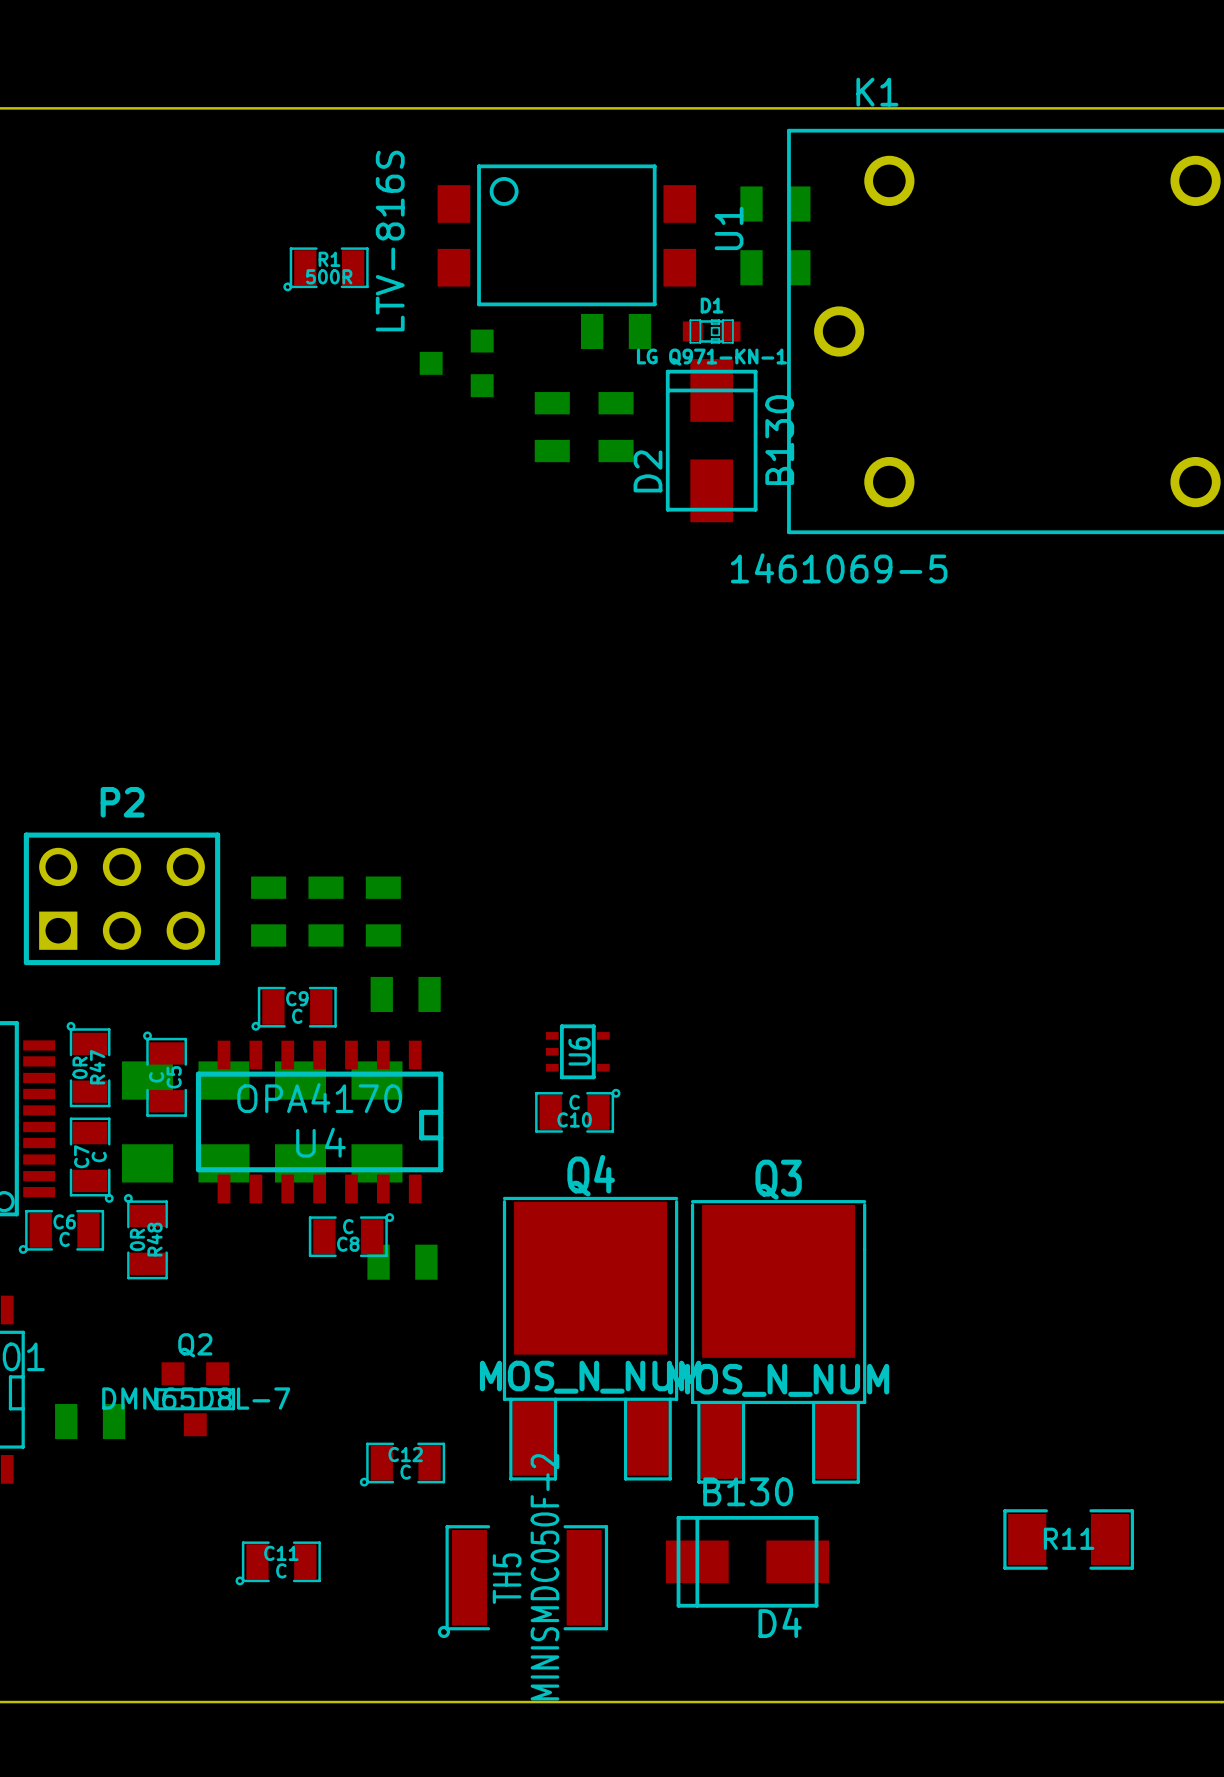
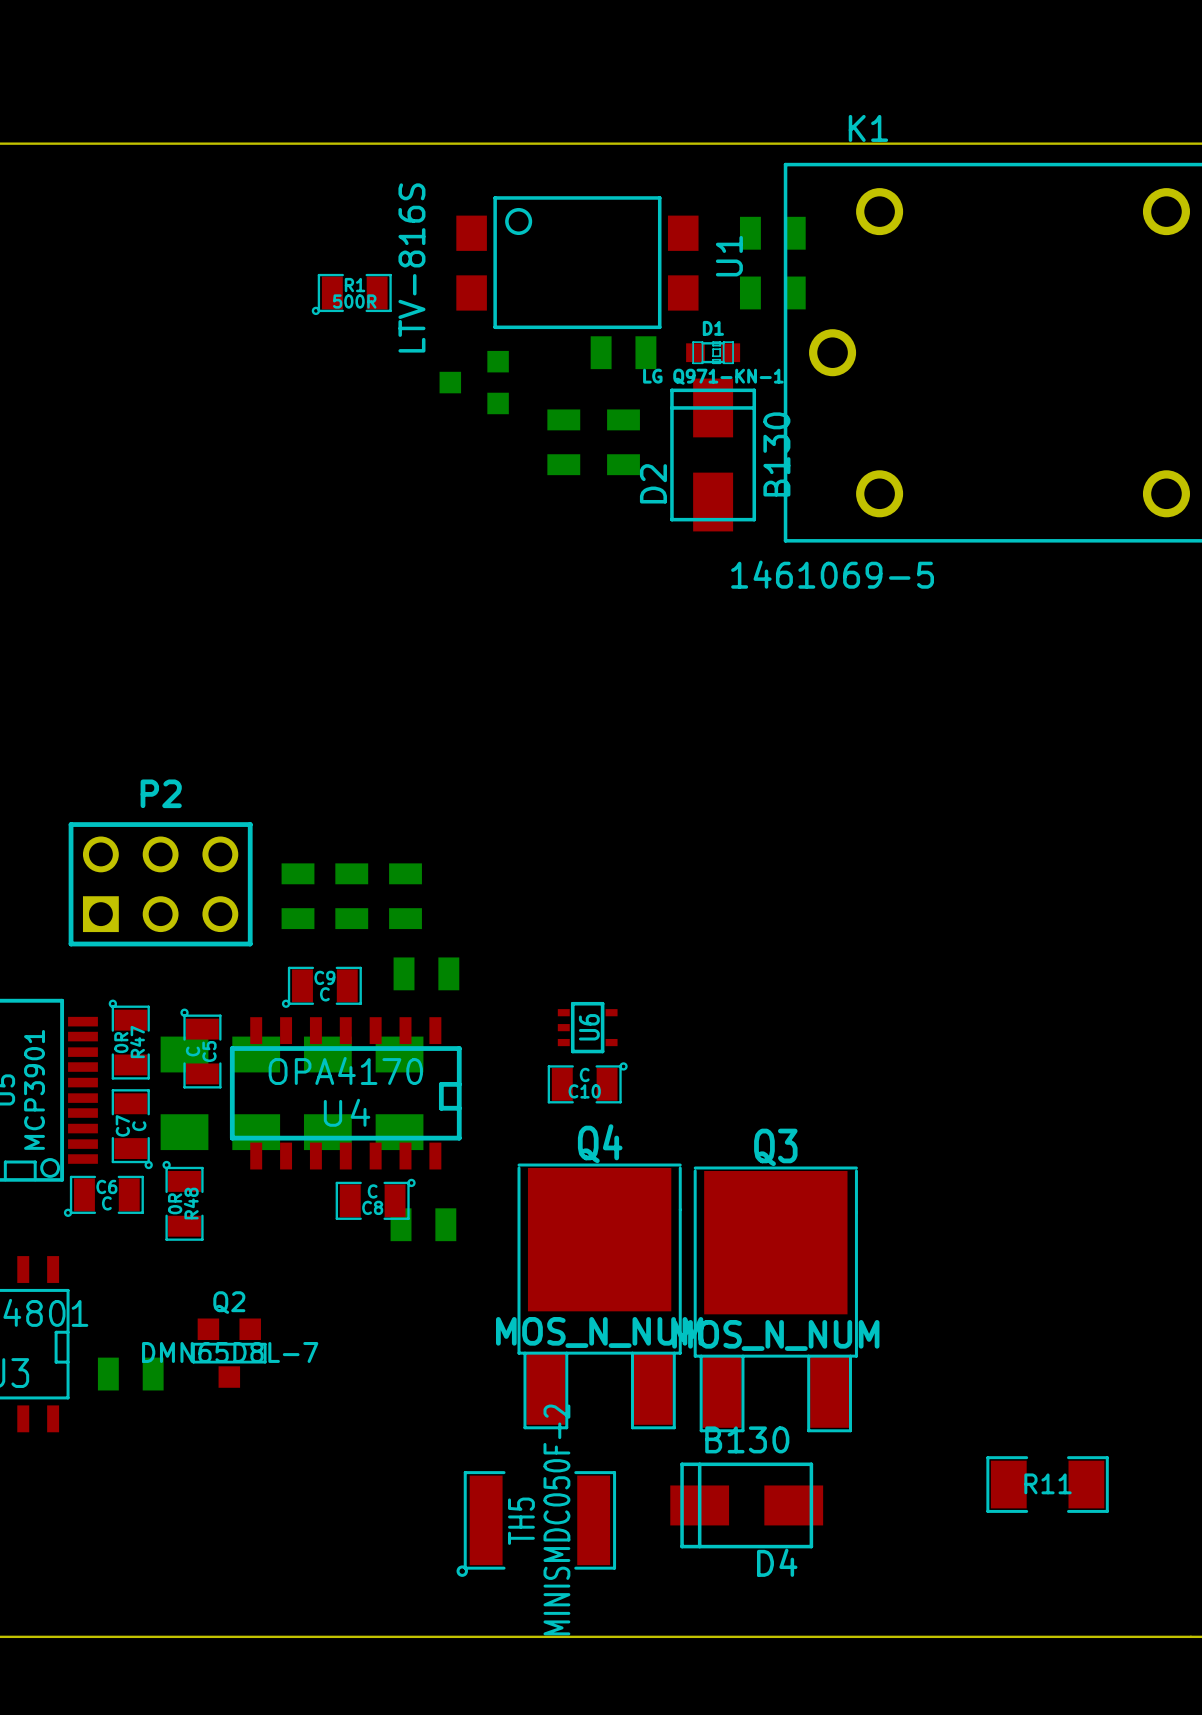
C12: C (402, 1464) -> none
C11: C (278, 1563) -> none

